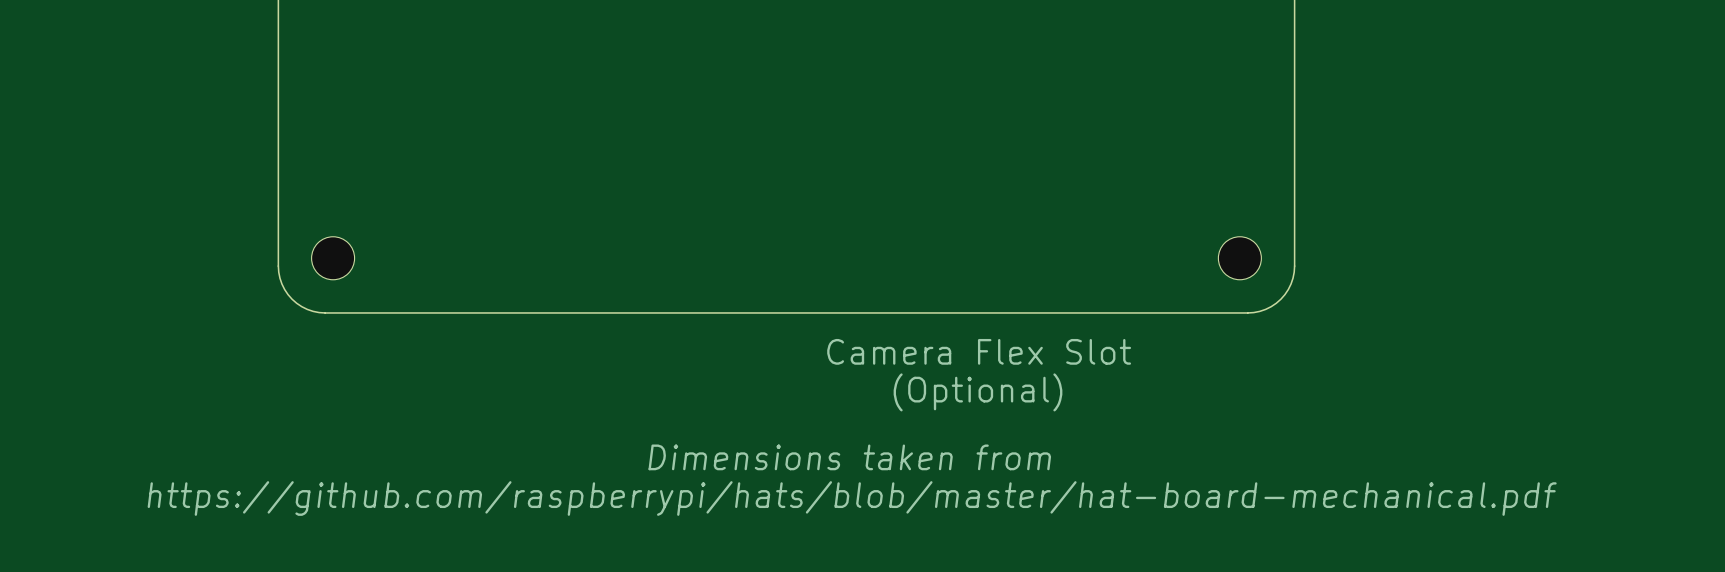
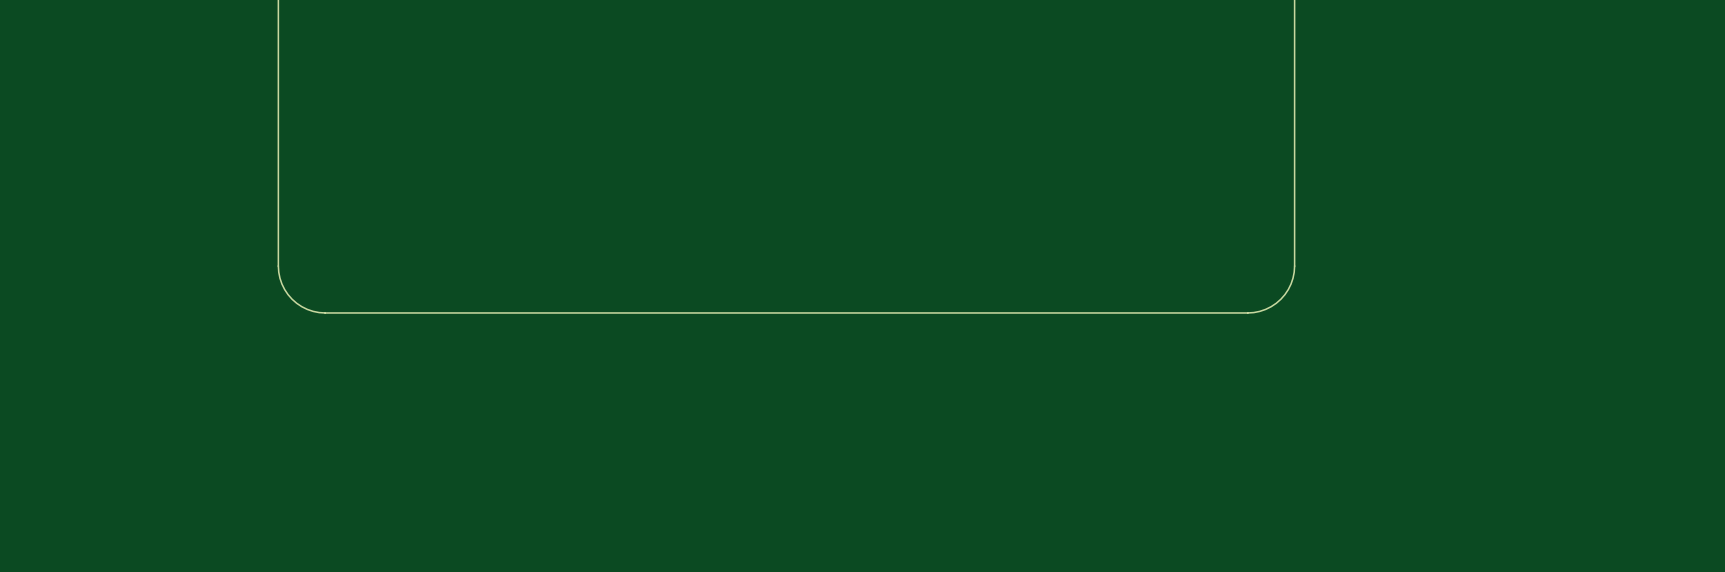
part: (333, 258) -> none
part: (1239, 258) -> none
text: Camera Flex Slot (979, 351) -> none
text: (Optional) (978, 392) -> none
text: Dimensions taken from (849, 457) -> none
text: https://github.com/raspberrypi/hats/blob/master/hat-board-mechanical.pdf (852, 498) -> none

